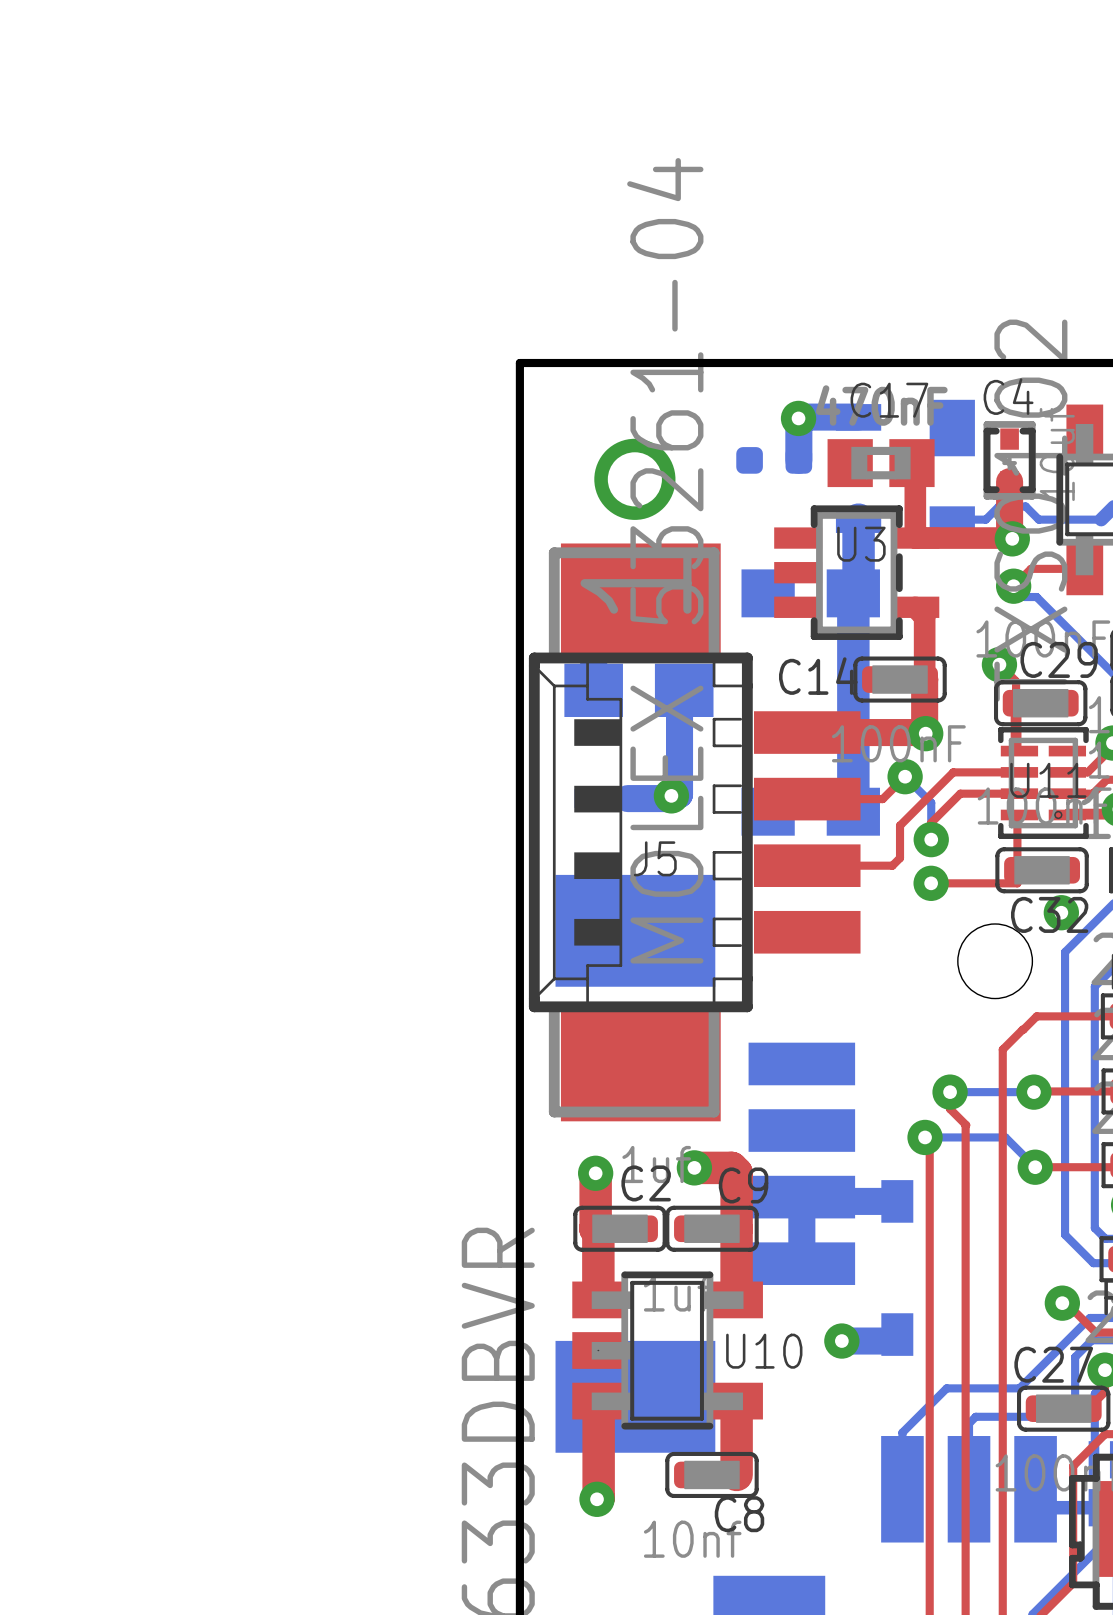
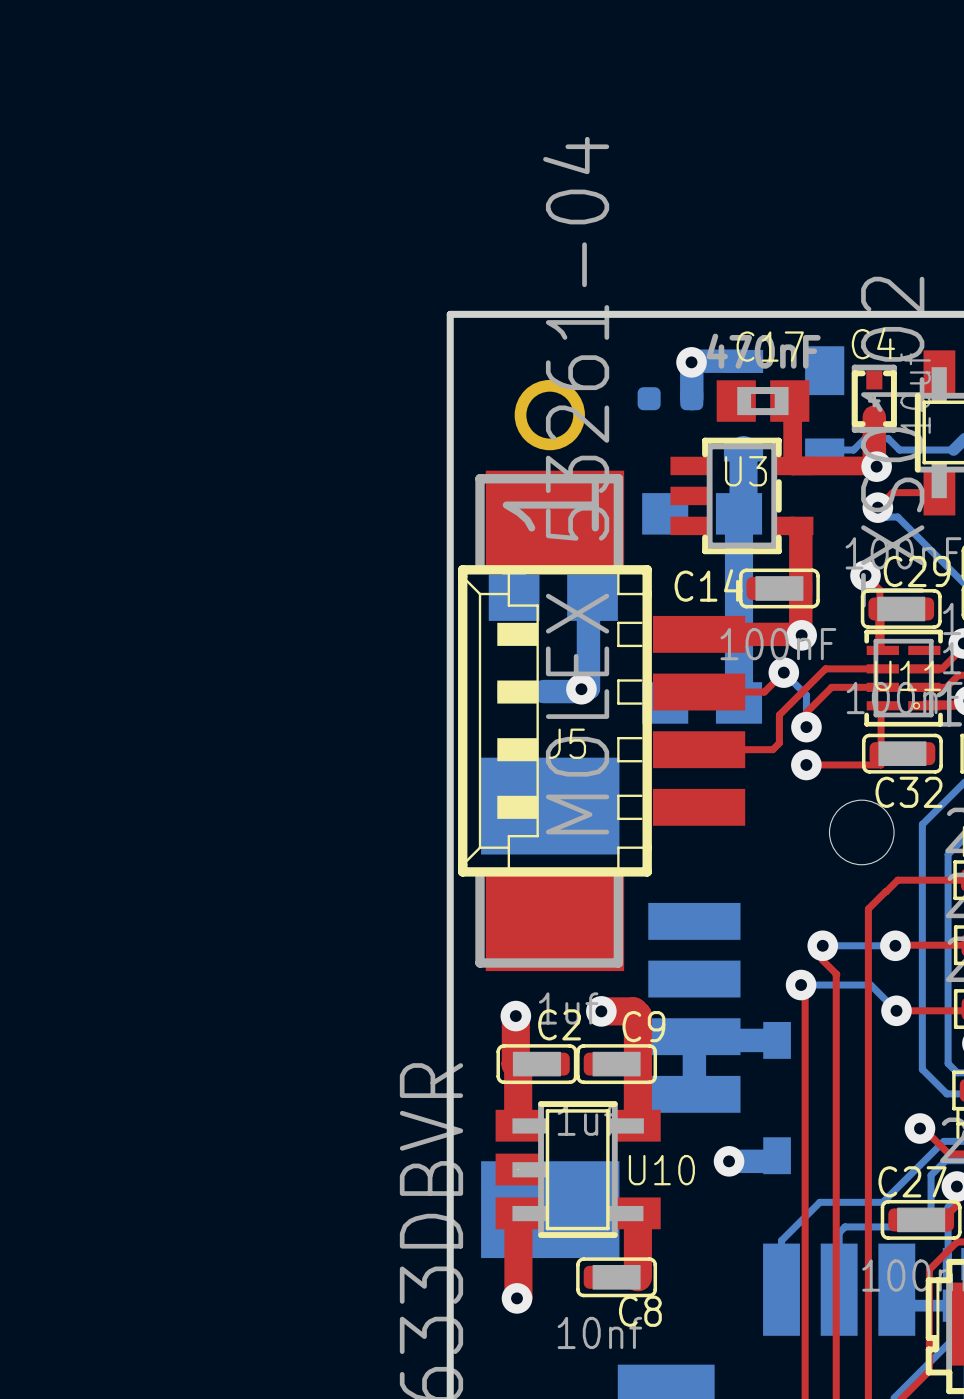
via: (1061, 912) -> none

